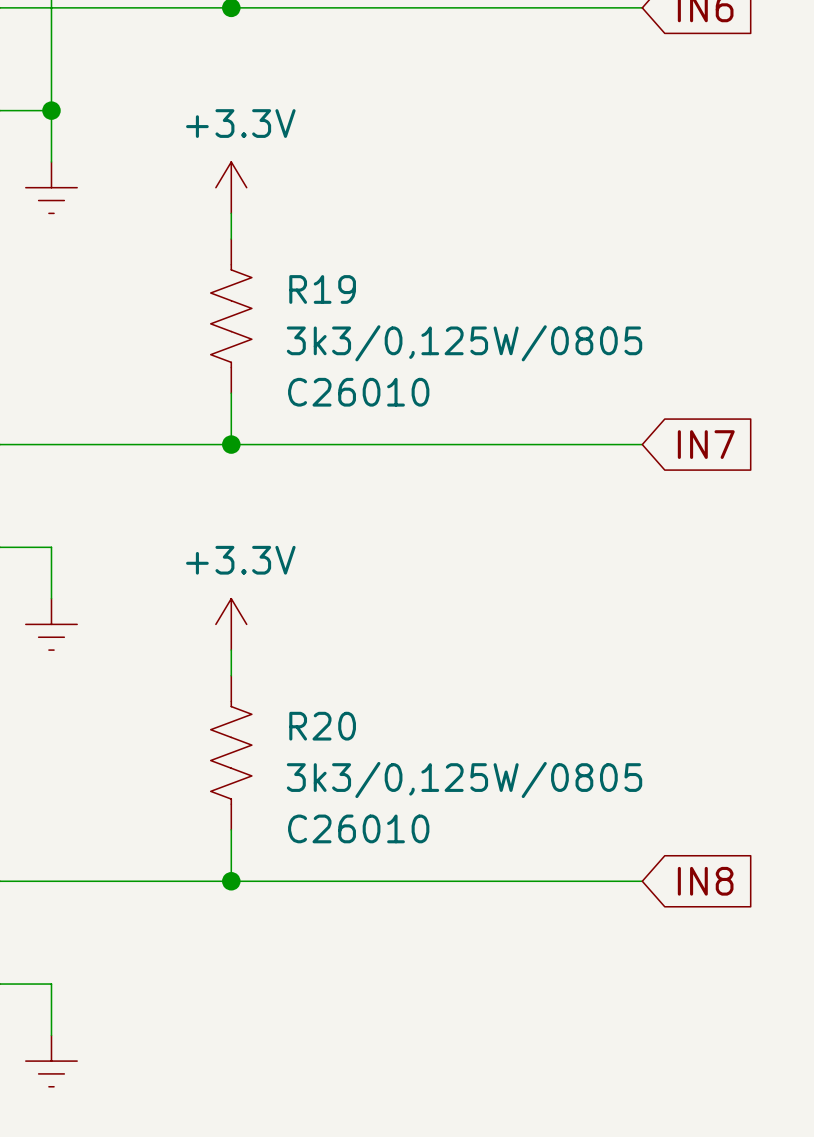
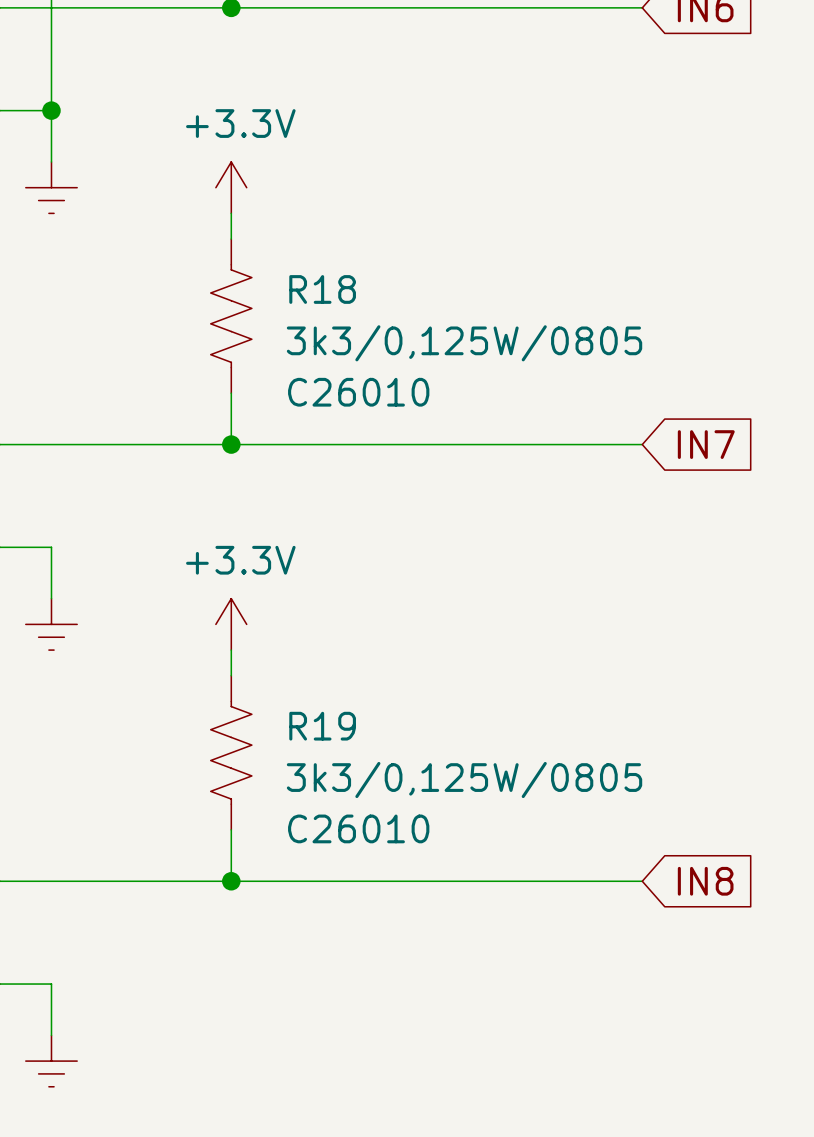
R19 name: R19 (322, 289) -> R18 (322, 289)
R20 name: R20 (322, 726) -> R19 (322, 726)

